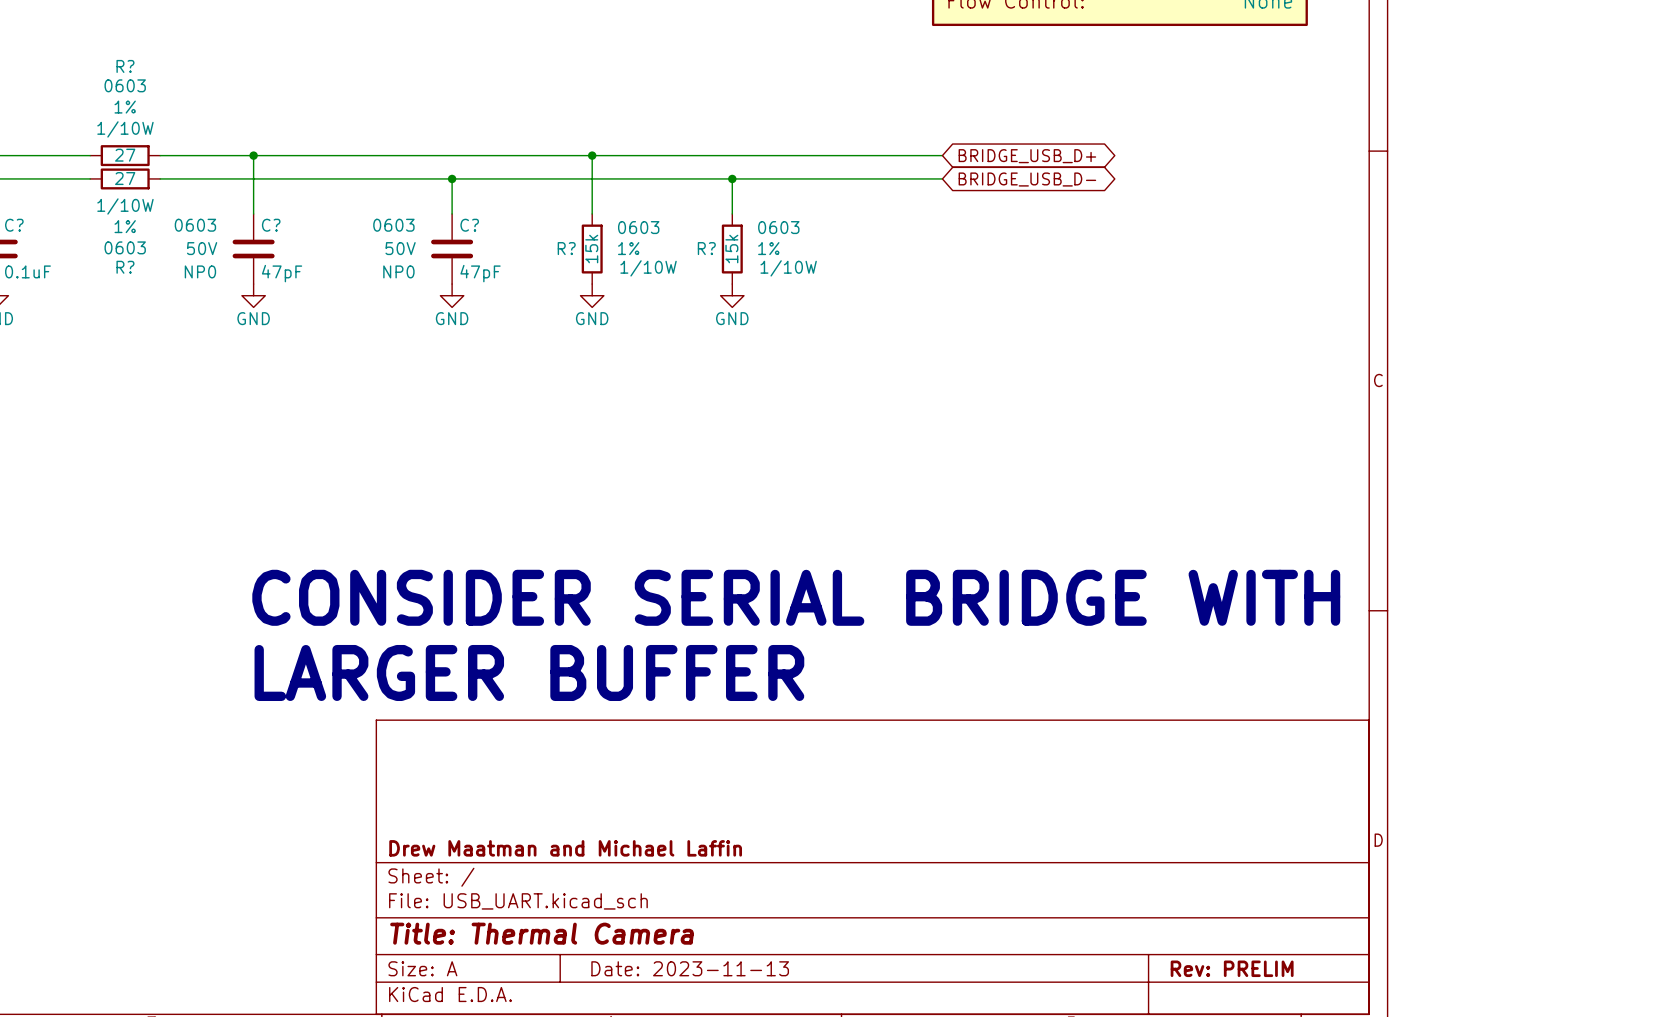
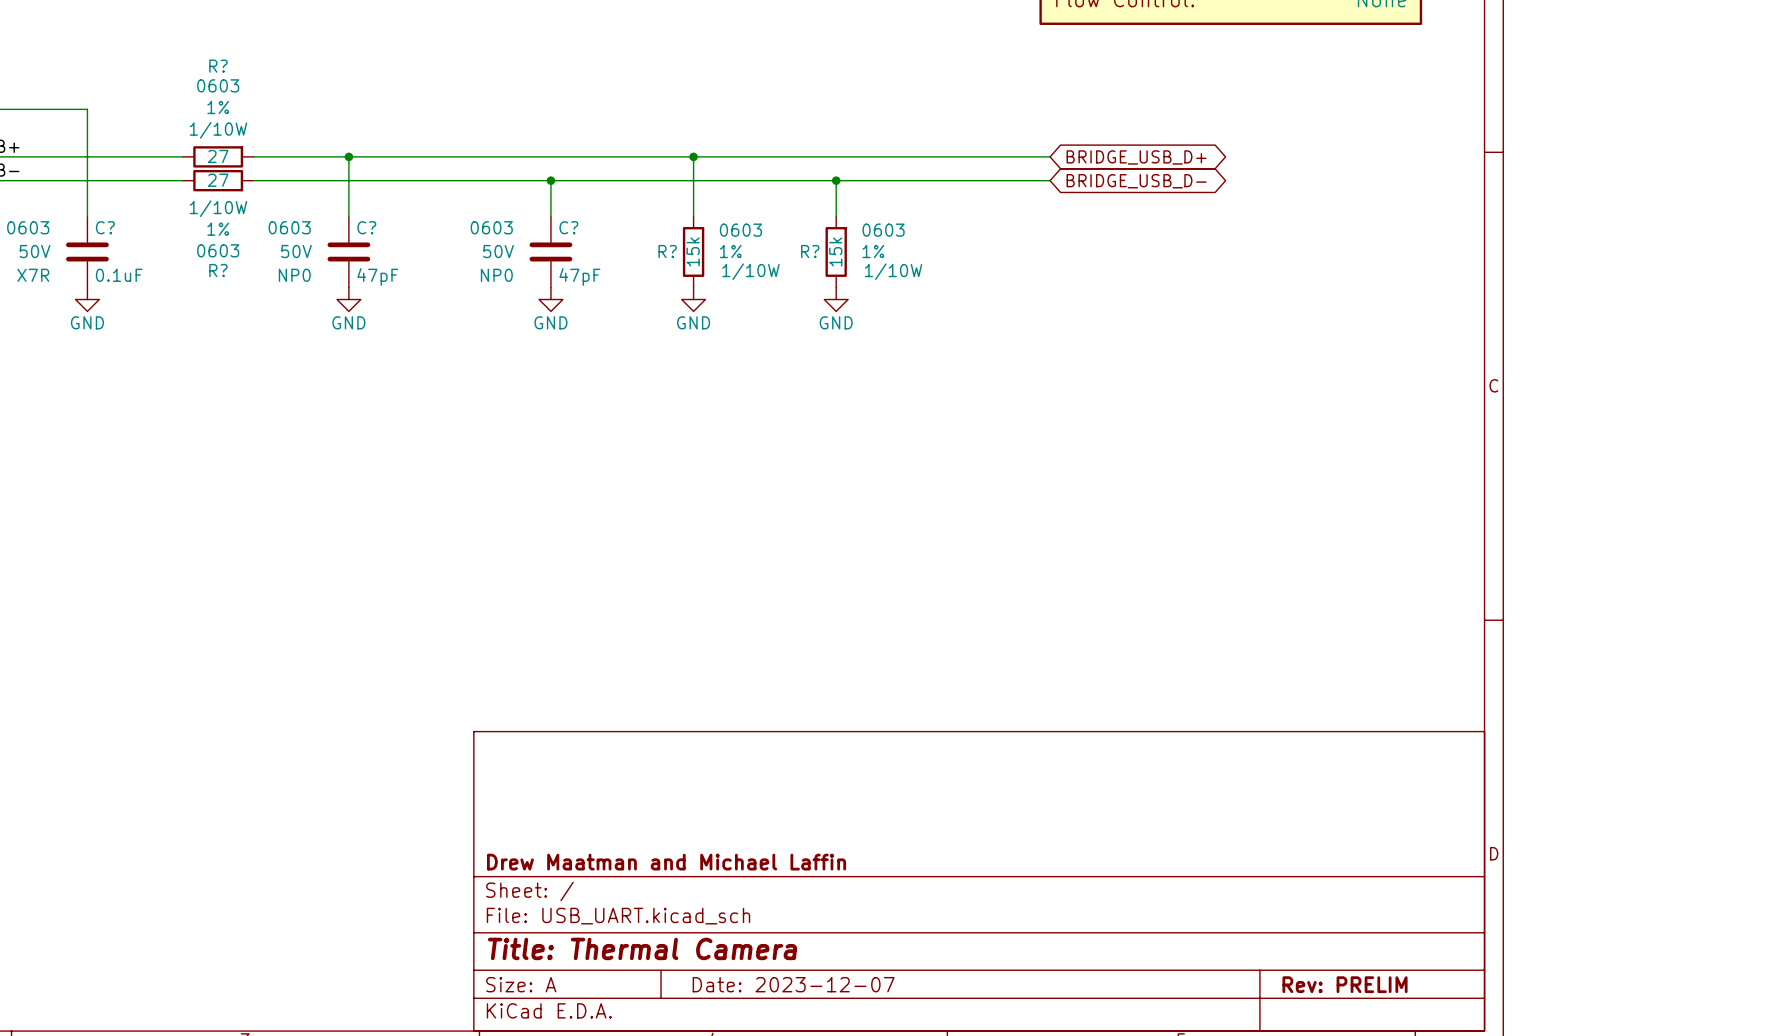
text: CONSIDER SERIAL BRIDGE WITH (796, 597) -> none
text: LARGER BUFFER (529, 672) -> none
title block: Date: 2023-11-13 (690, 968) -> Date: 2023-12-07 (793, 984)

